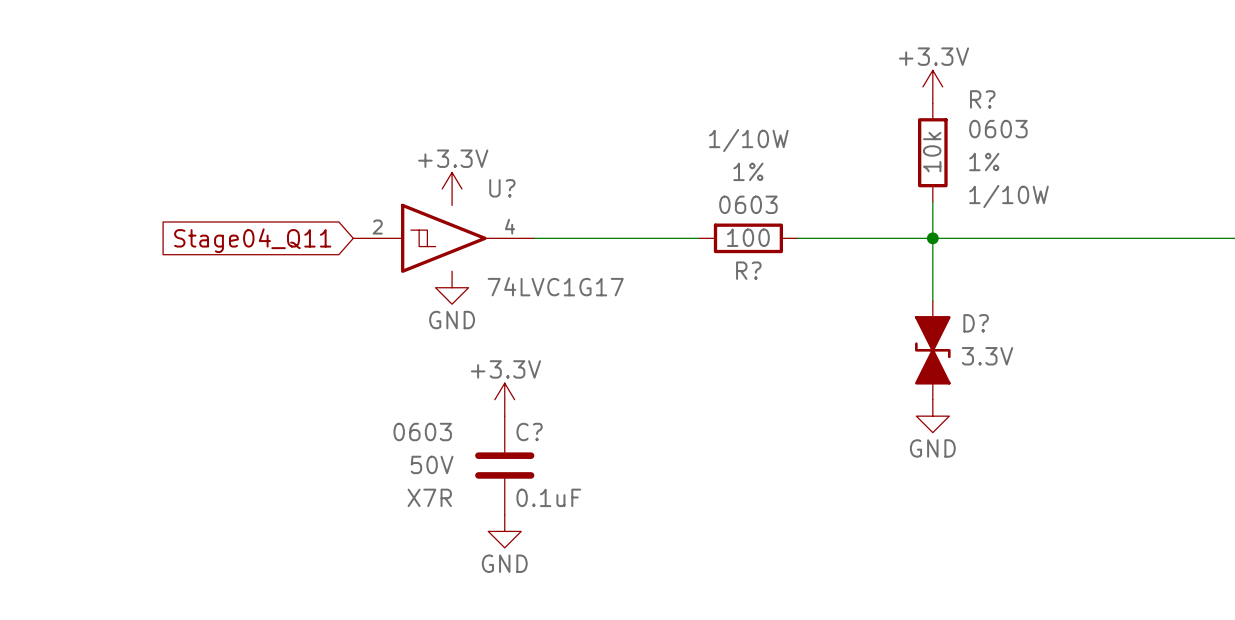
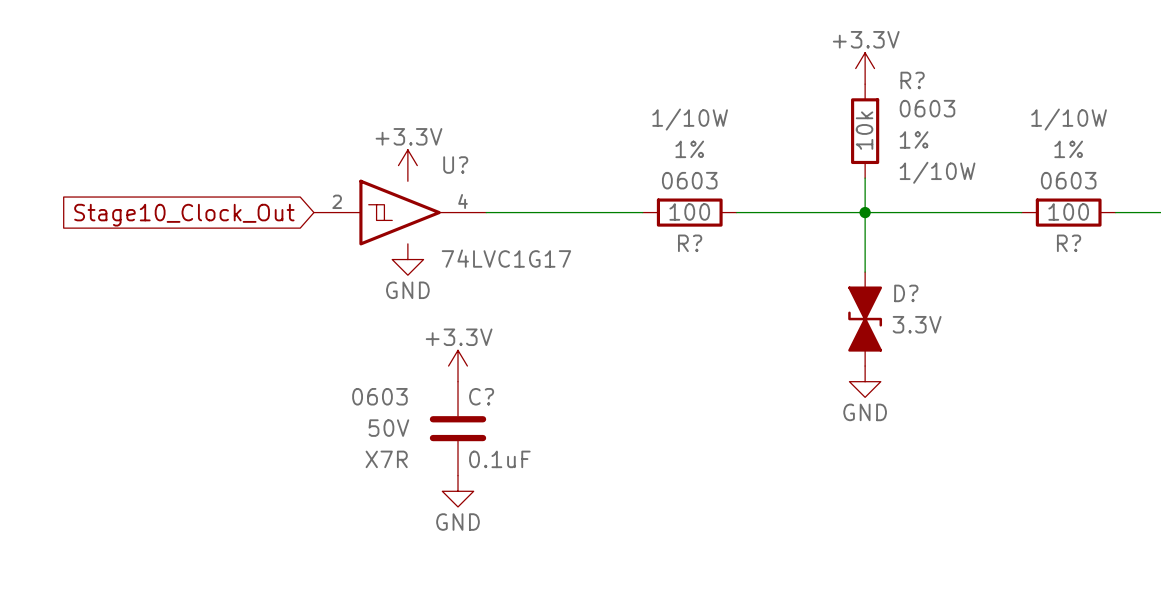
wire: (1097, 238) (1196, 238) -> none
R?: none -> 100 (1068, 212)
global label: Stage04_Q11 (252, 240) -> Stage10_Clock_Out (184, 215)

